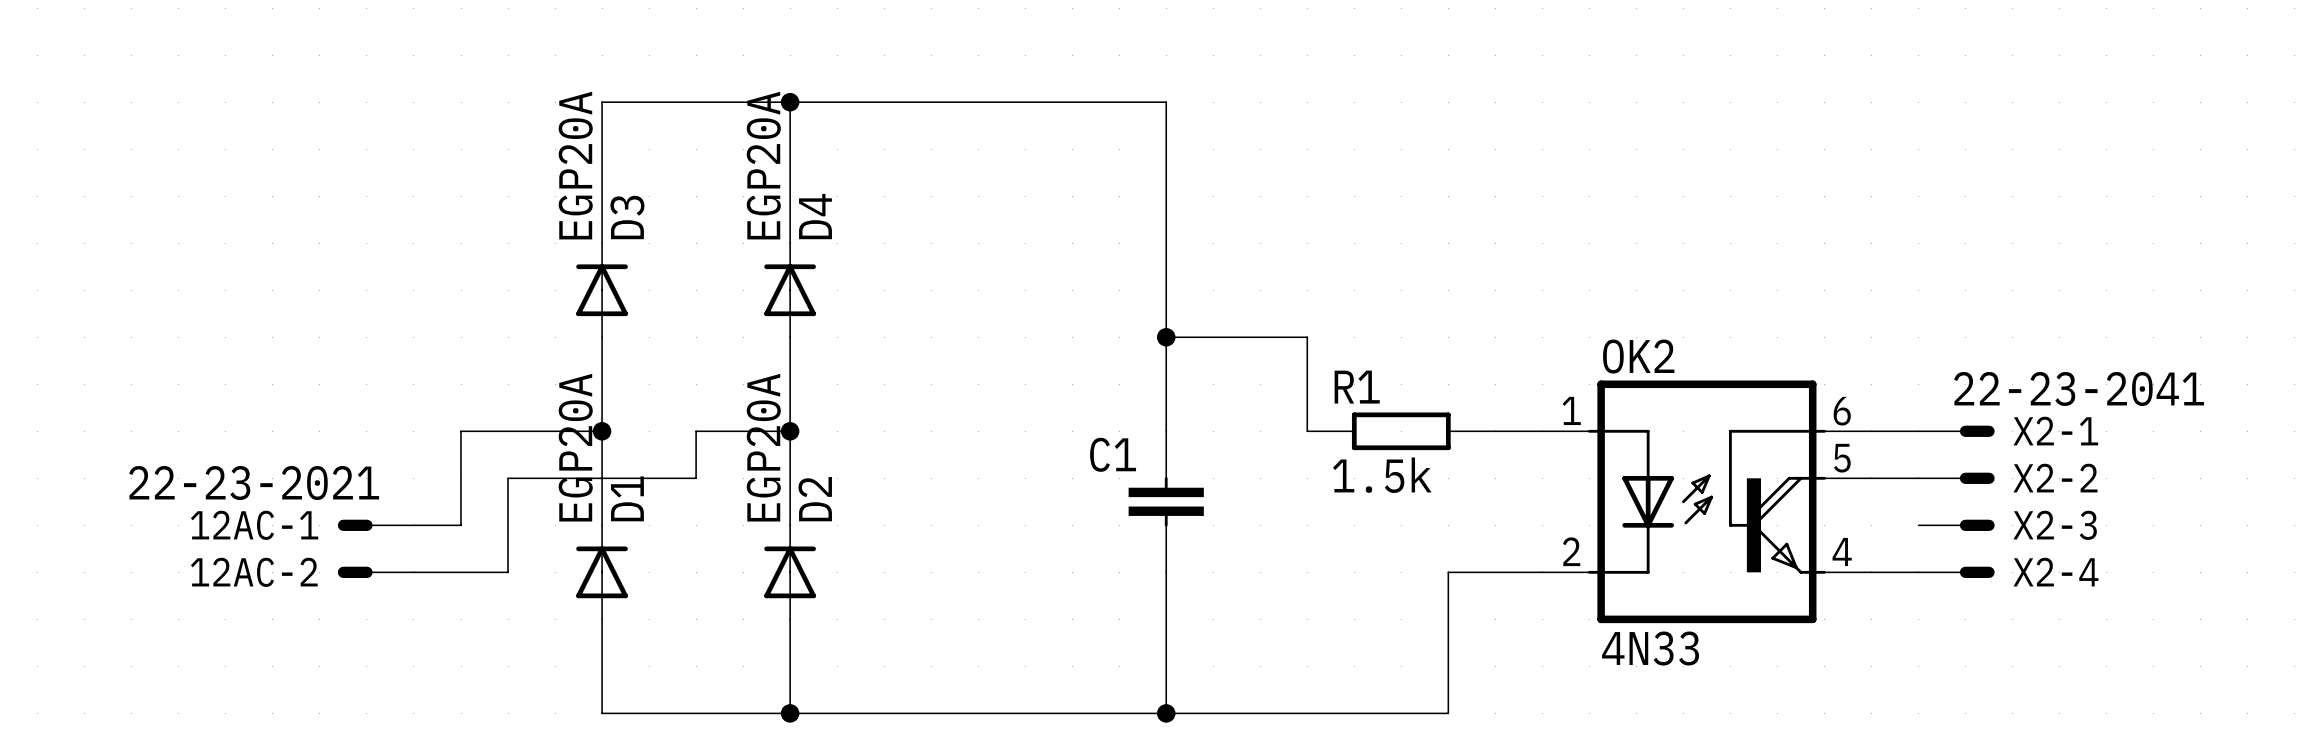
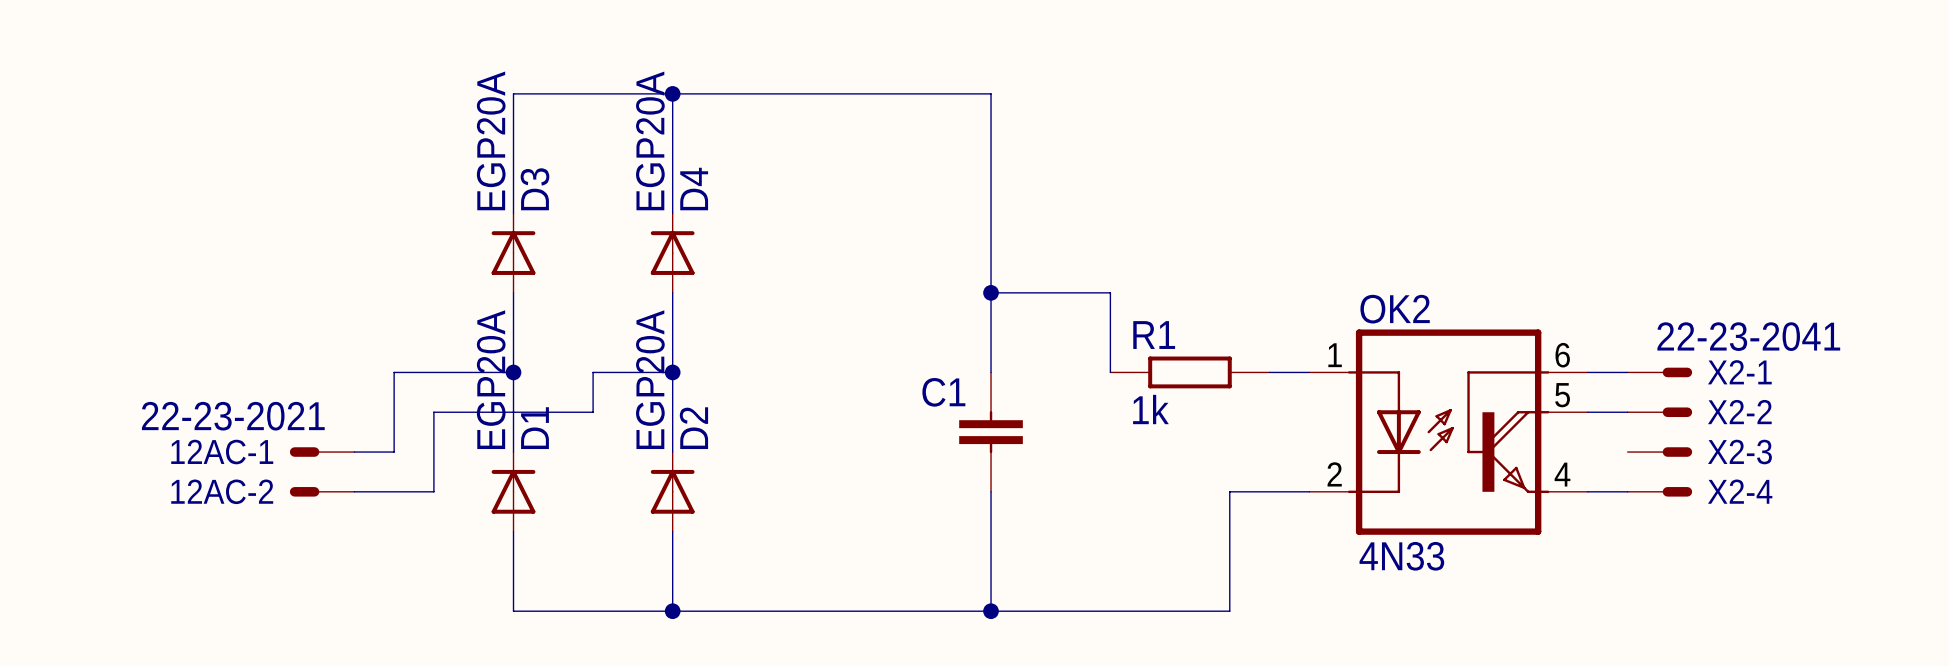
R1 value: 1.5k (1382, 475) -> 1k (1150, 409)

